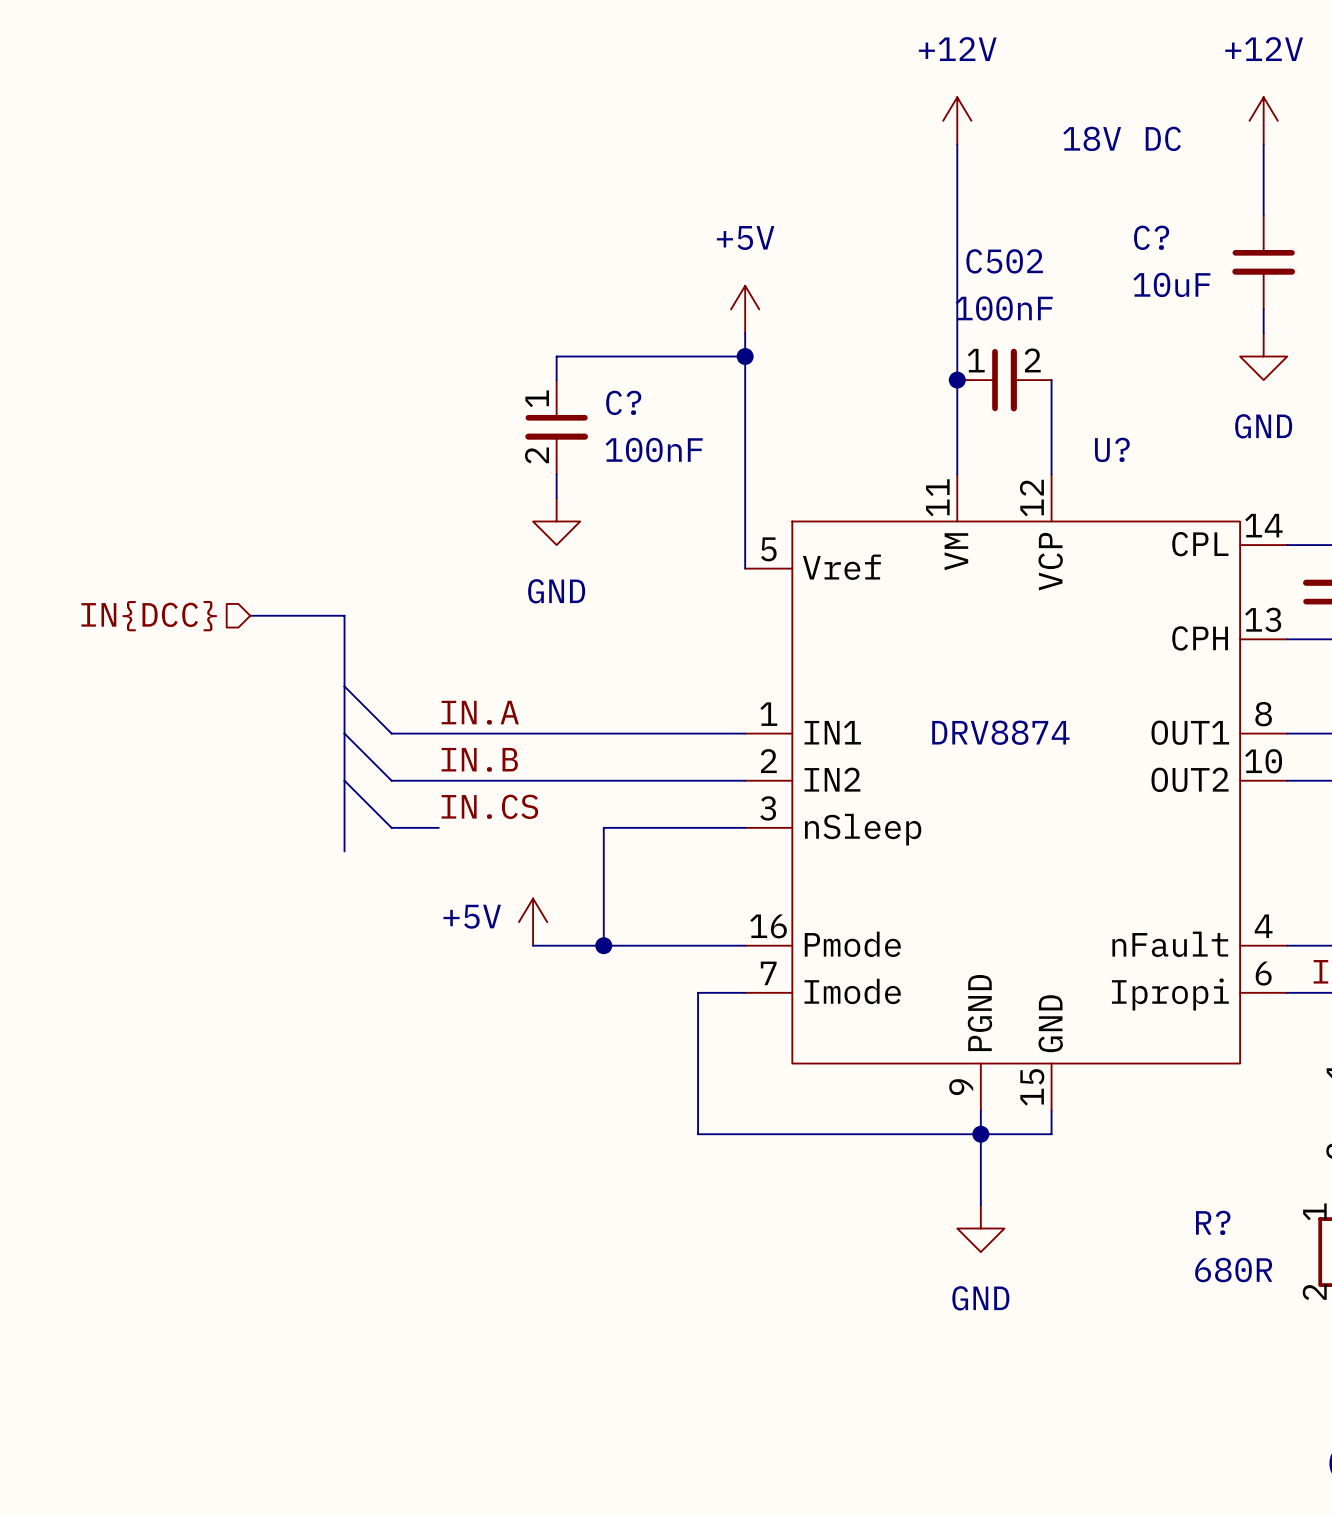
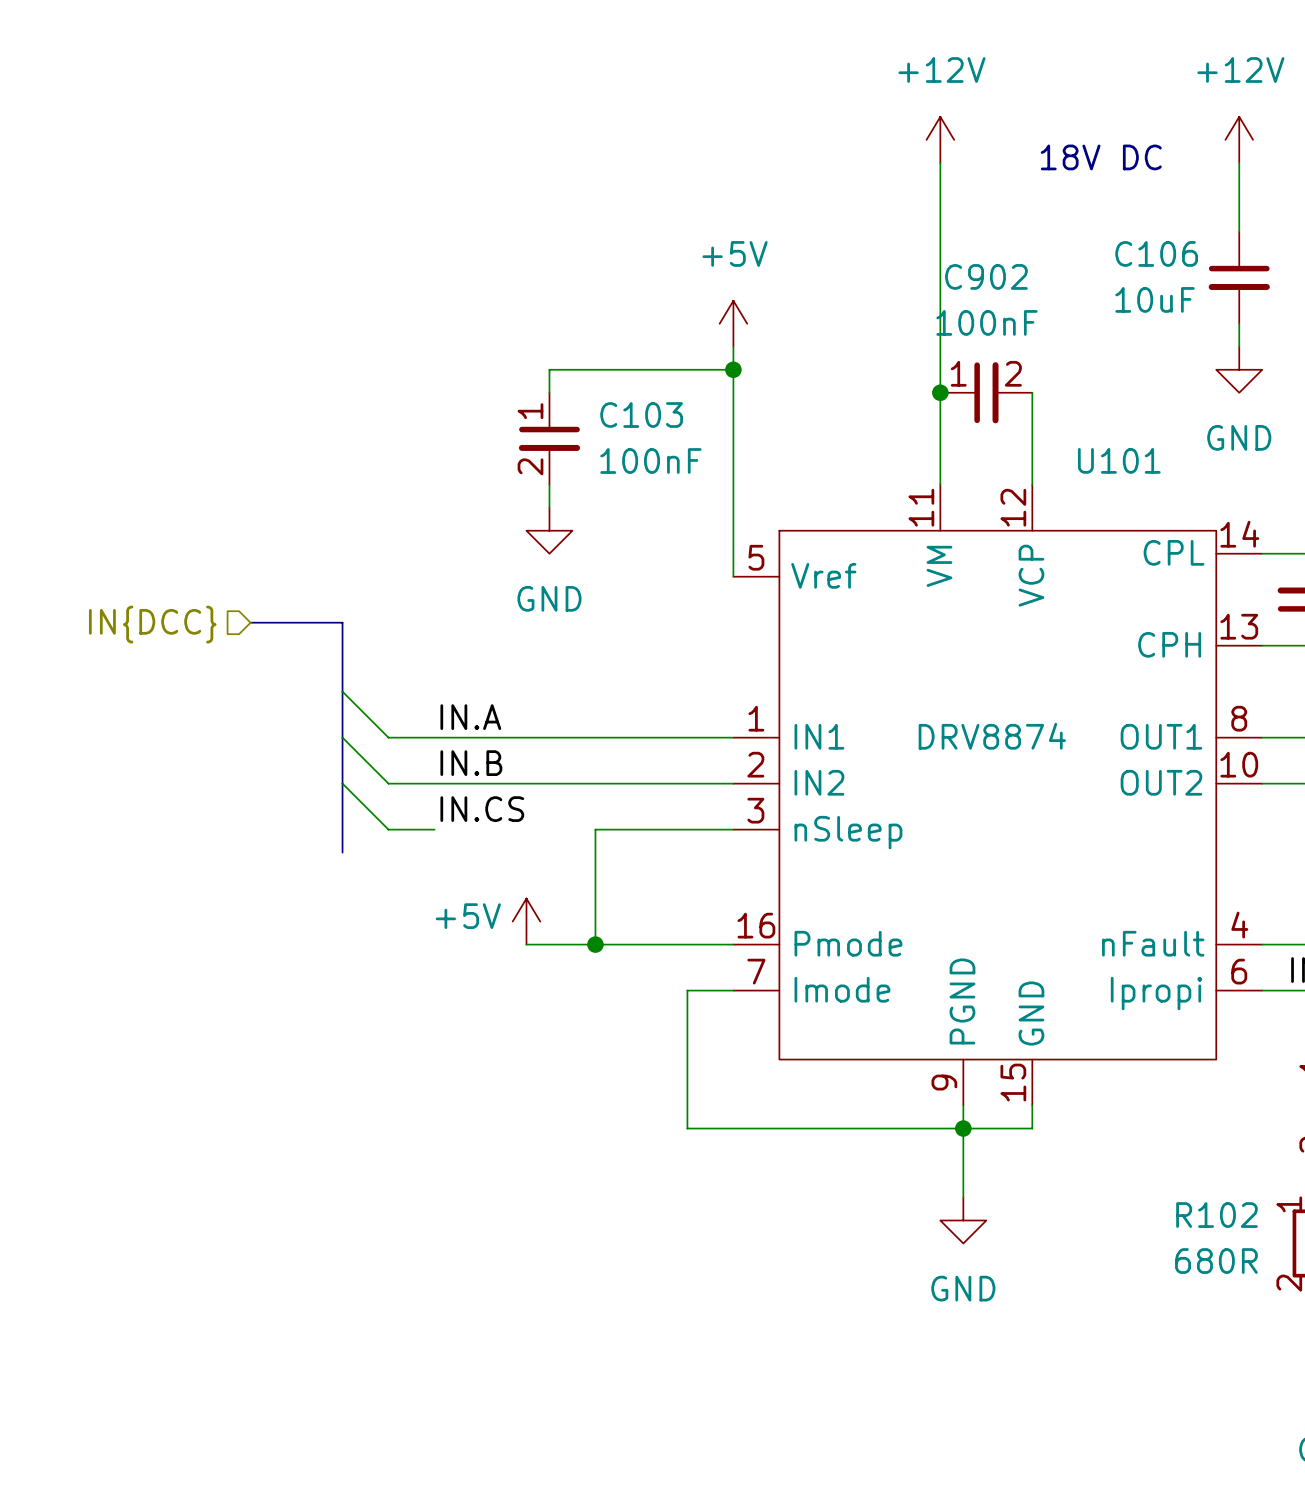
C? name: C? (1151, 237) -> C106 (1156, 253)
C502 name: C502 (1004, 261) -> C902 (986, 276)
C? name: C? (623, 402) -> C103 (641, 415)
U? name: U? (1112, 449) -> U101 (1119, 460)
R? name: R? (1213, 1222) -> R102 (1216, 1215)

